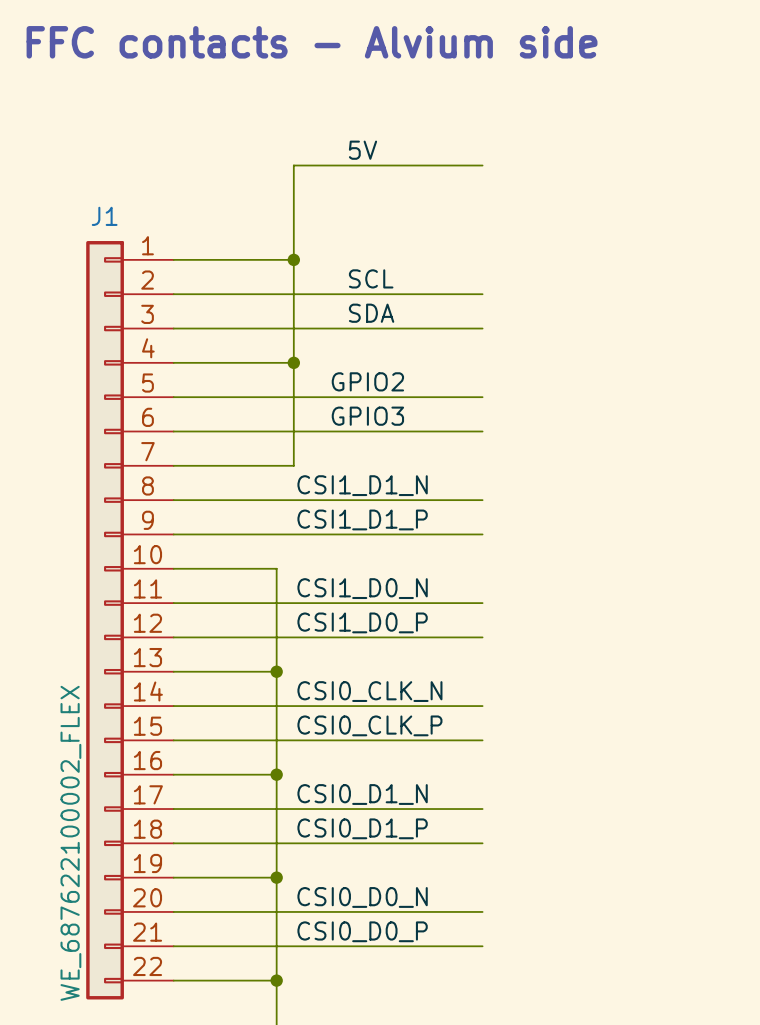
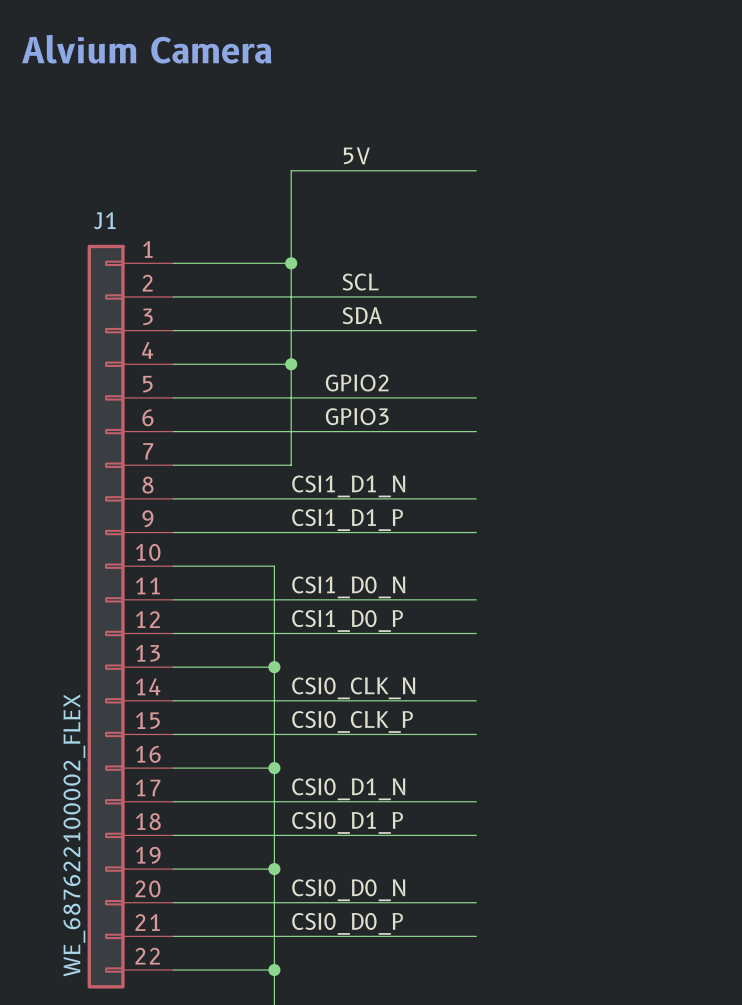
text: FFC contacts - Alvium side (312, 42) -> Alvium Camera (146, 49)

